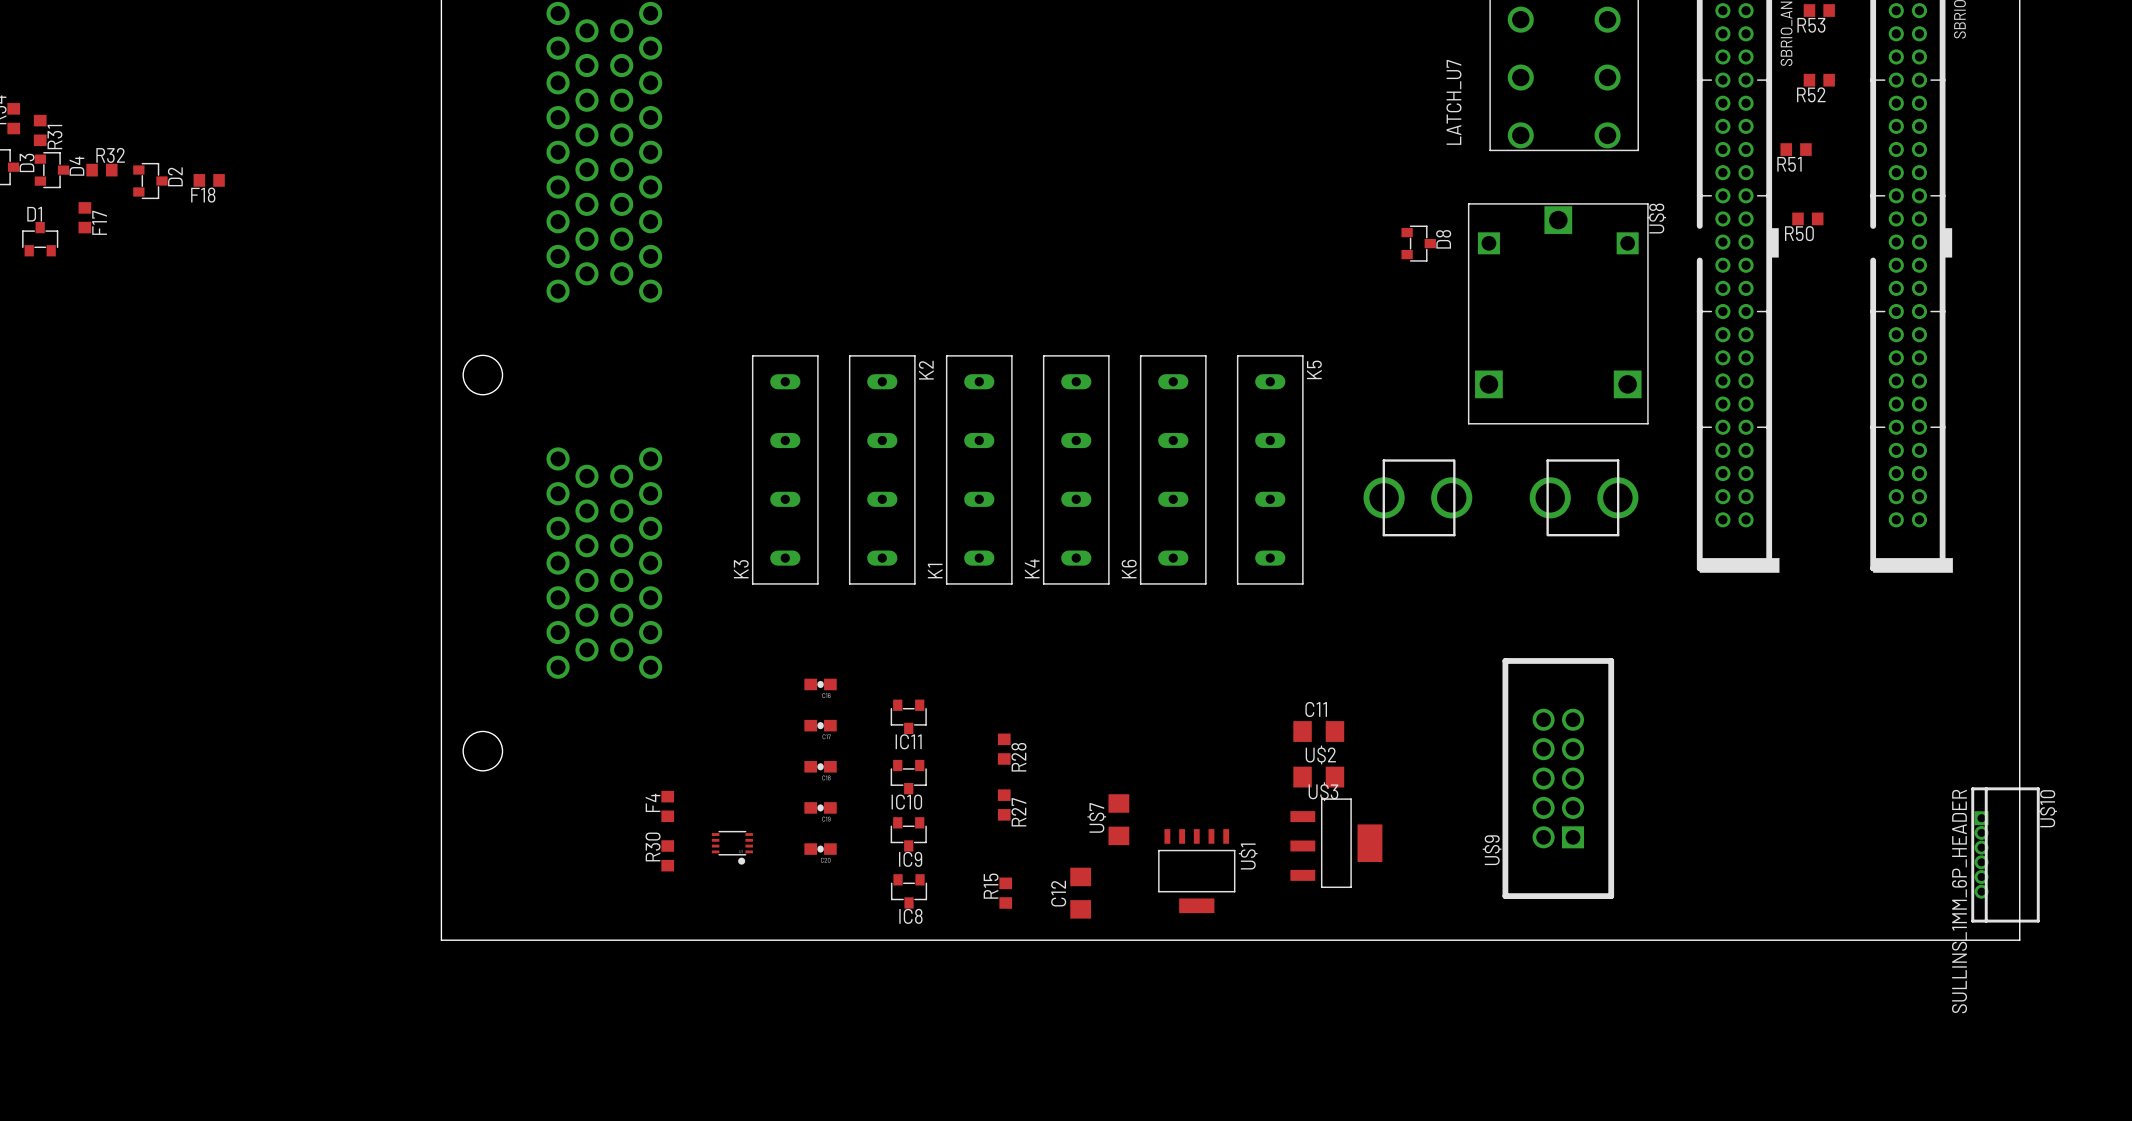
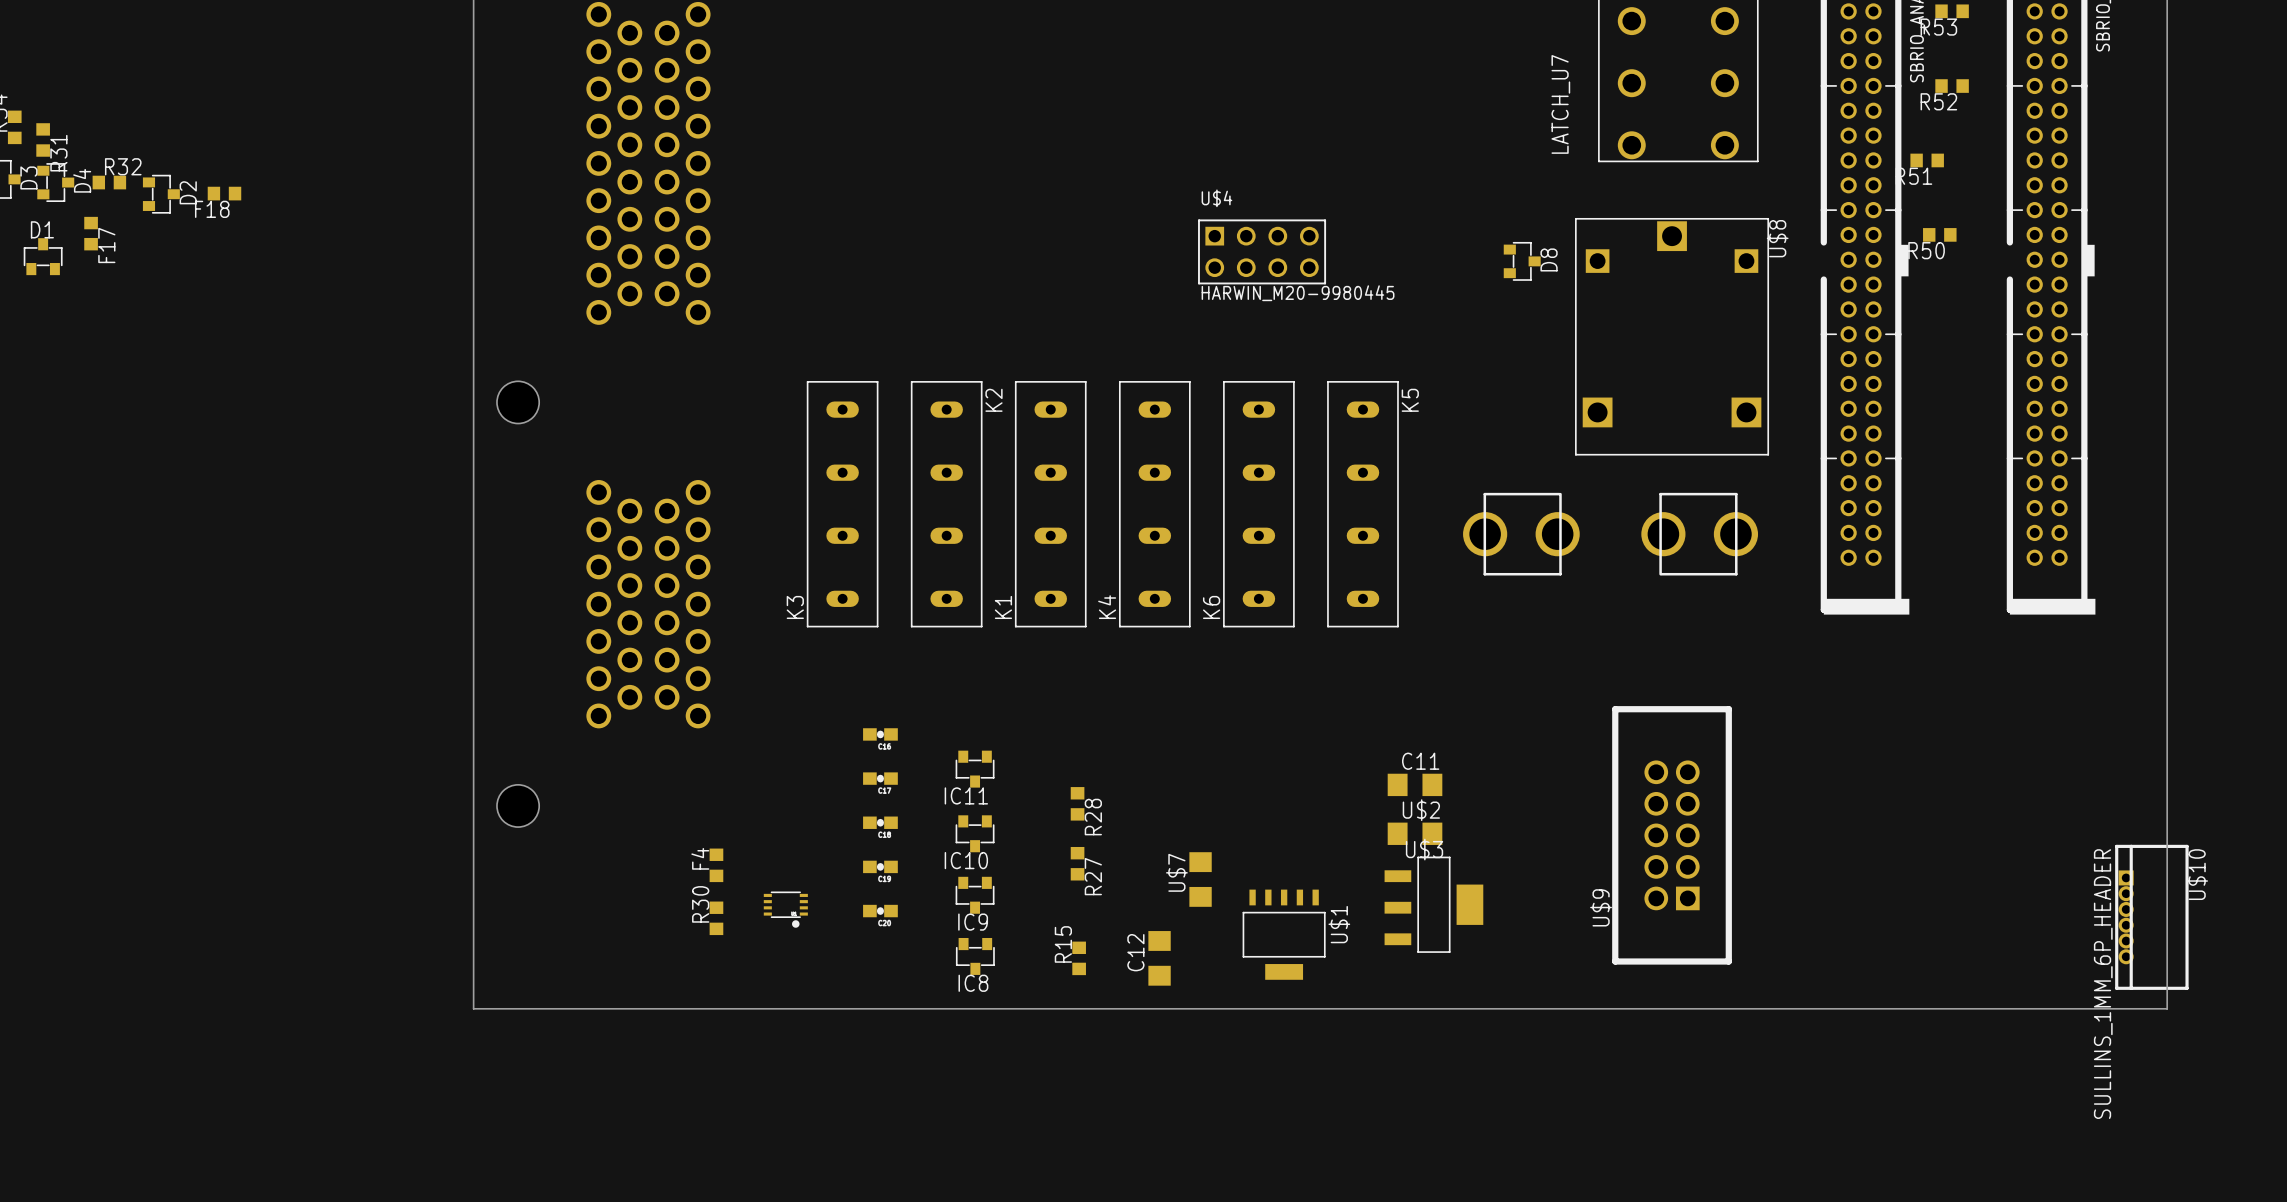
U$4: none -> HARWIN_M20-9980445 (1262, 251)

